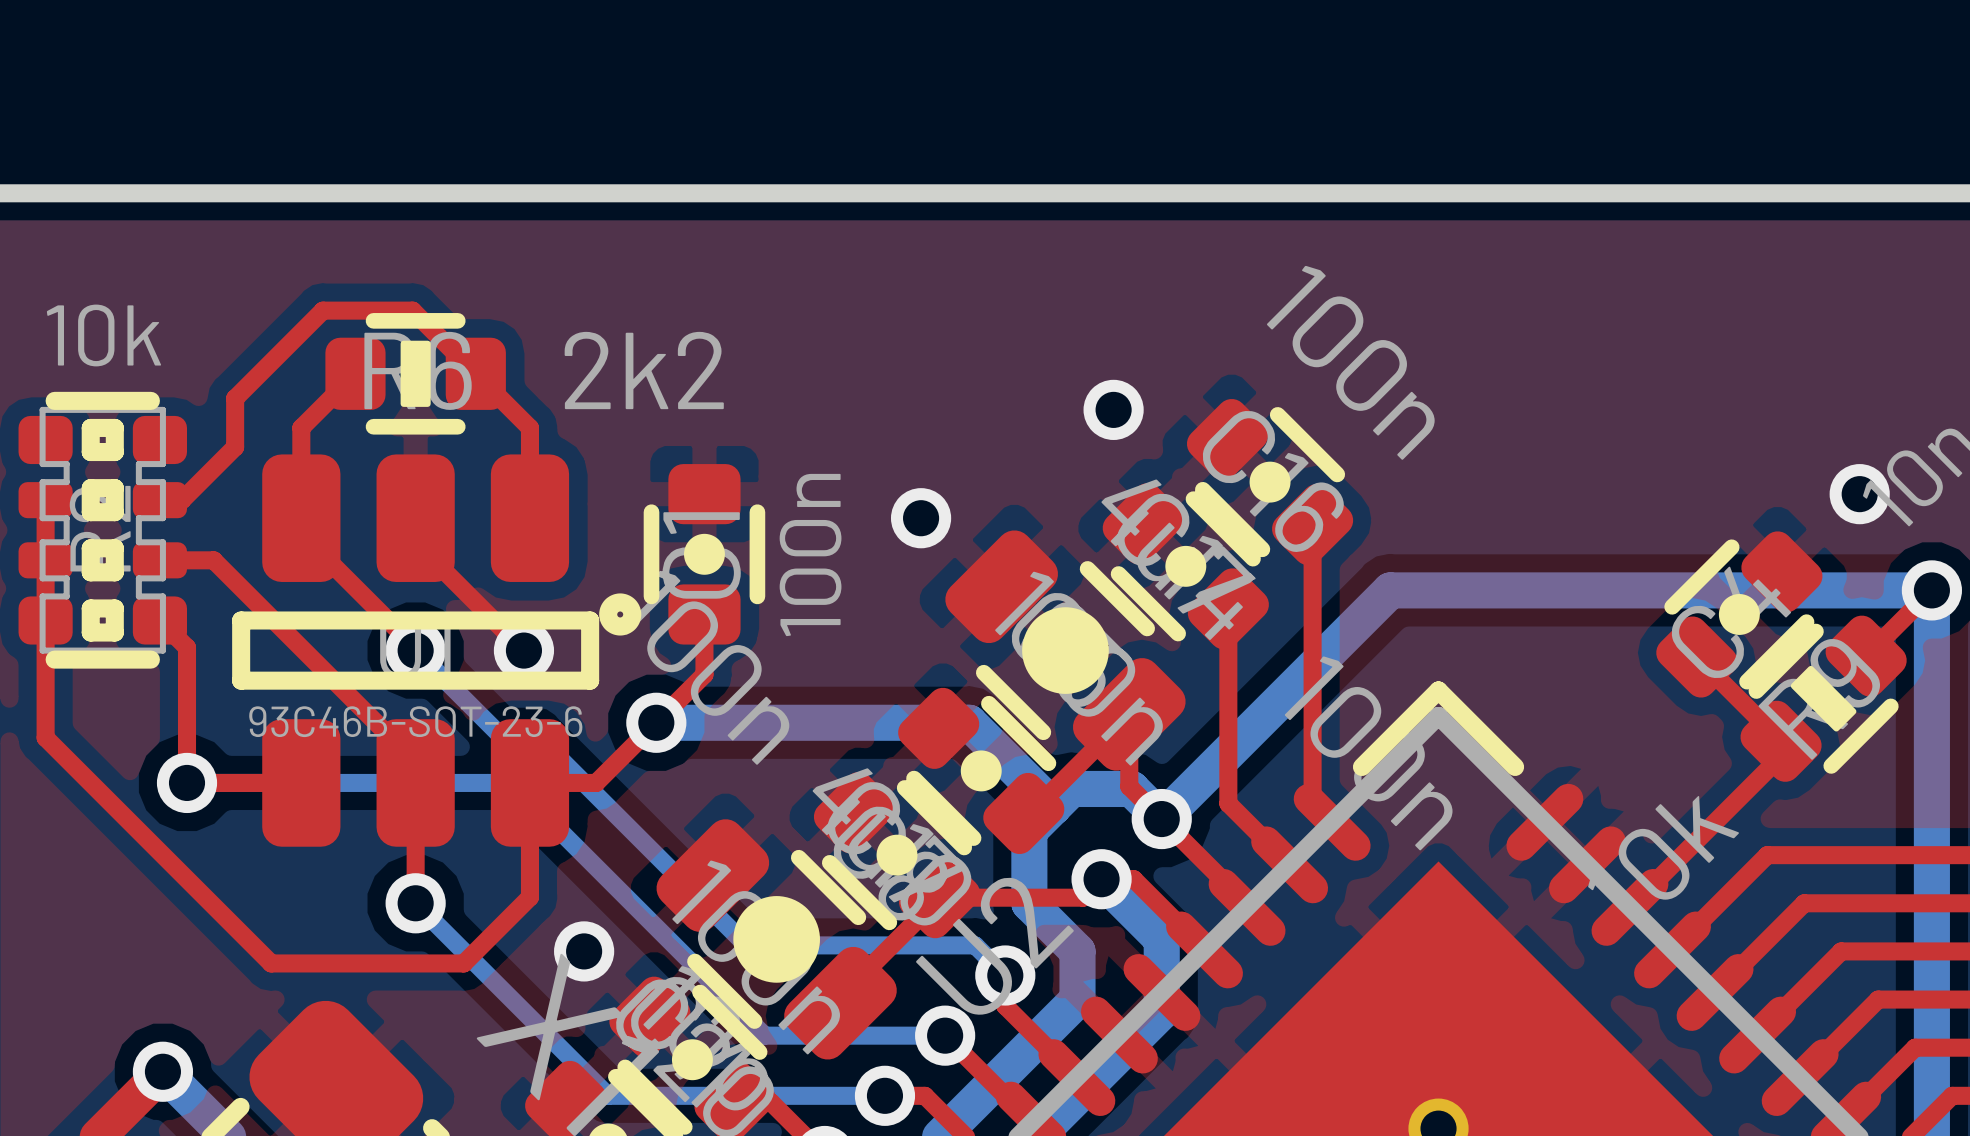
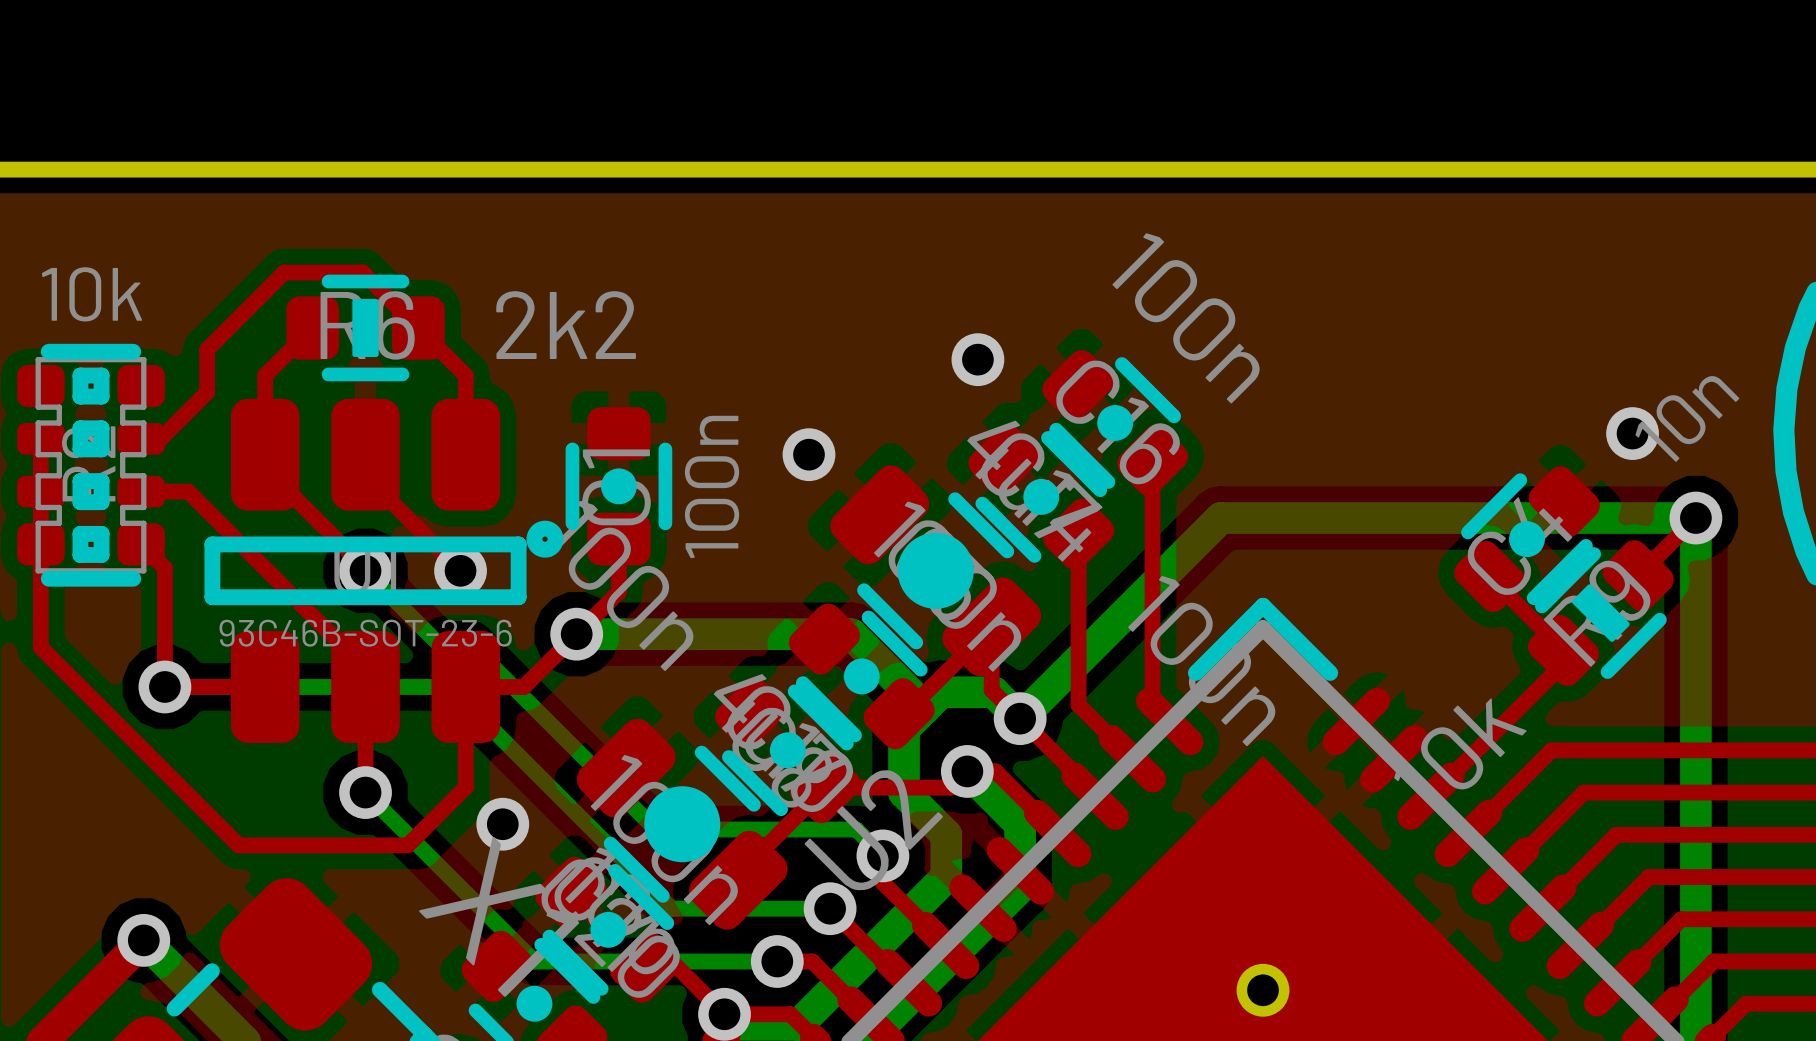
via position: (584, 951) -> (502, 824)

